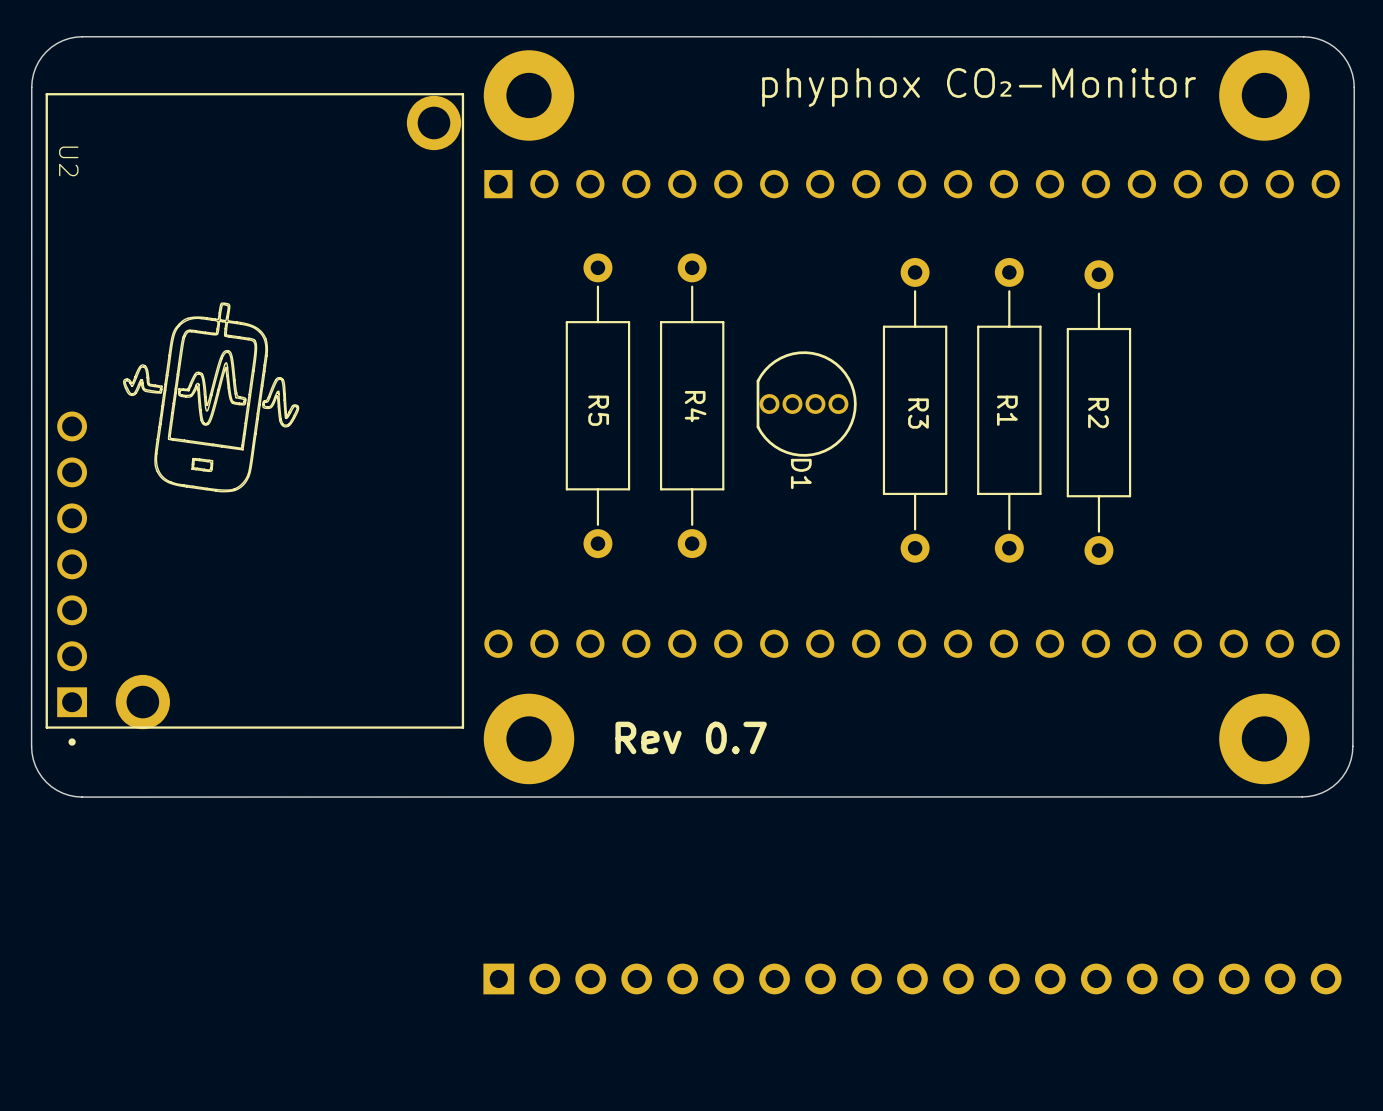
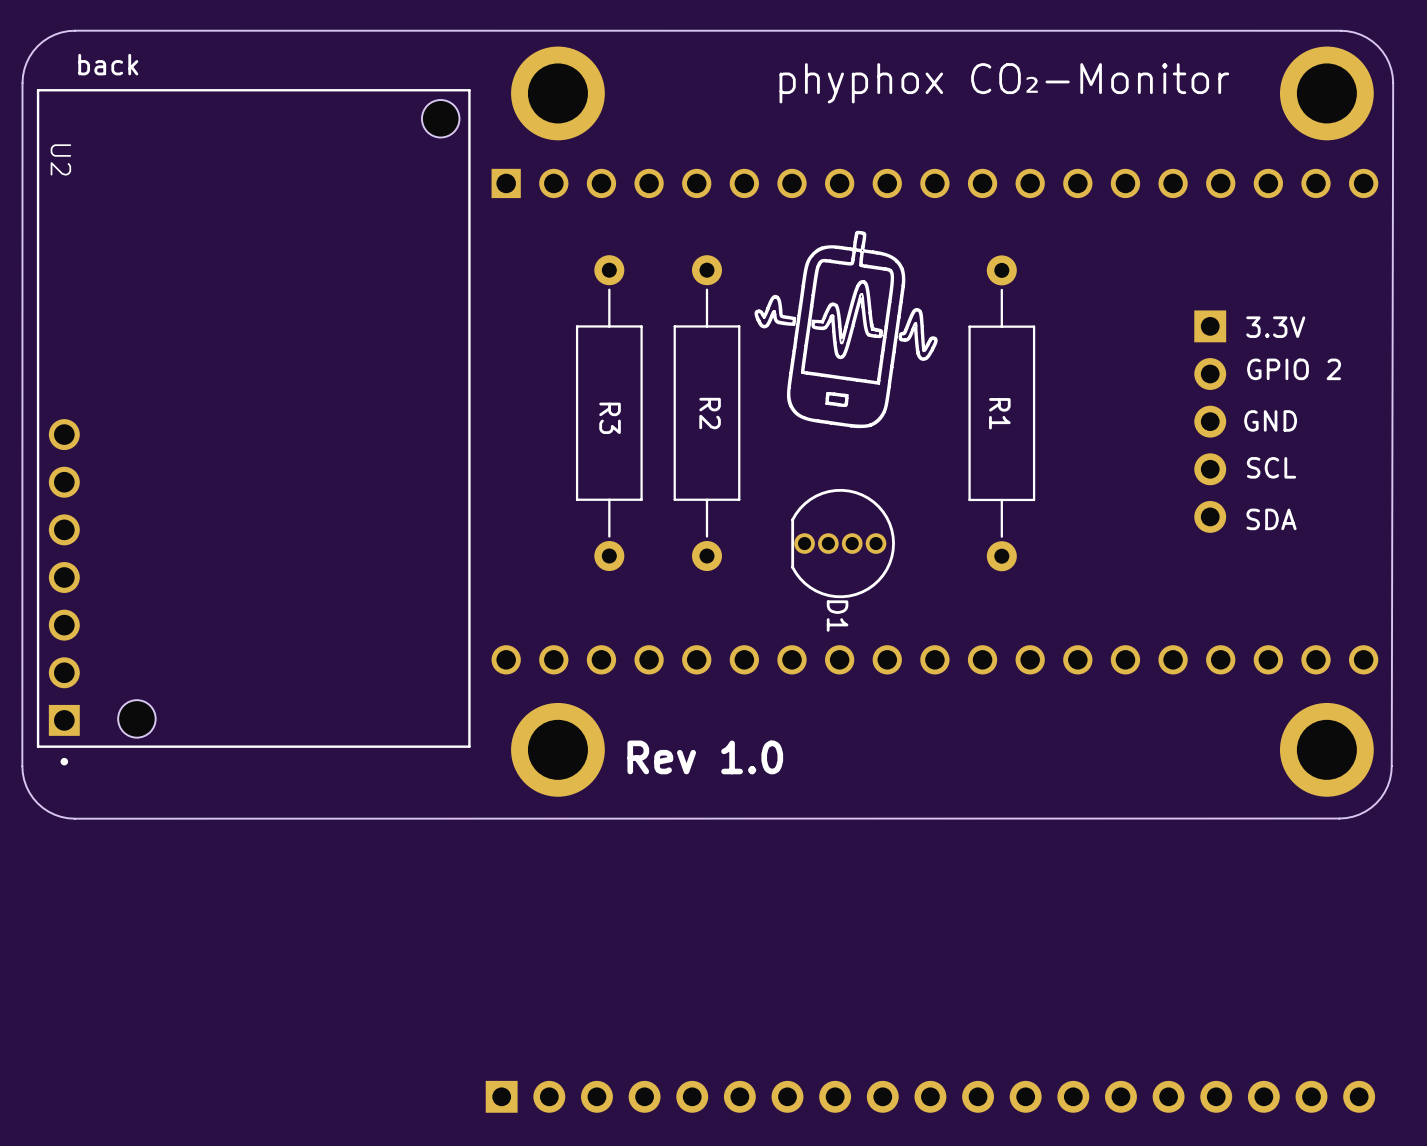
text: none -> back (108, 64)
part footprint: [406, 95, 462, 151] -> [421, 100, 460, 138]
part: (529, 95) -> none
part: (1264, 95) -> none
part: none -> (557, 93)
part: none -> (1326, 93)
line: none -> (860, 231) (865, 234) (863, 249) (884, 253) (895, 259) (902, 268) (904, 280) (886, 408) (876, 422) (869, 426) (858, 427) (802, 417) (792, 409) (787, 395) (803, 278) (807, 260) (815, 251) (822, 247) (834, 246) (853, 248) (856, 233) (860, 231)
line: none -> (863, 234) (857, 234) (855, 249) (861, 249) (863, 234)
line: none -> (835, 247) (852, 250) (851, 263) (824, 259) (818, 264) (802, 372) (879, 383) (892, 274) (888, 268) (861, 264) (863, 251) (890, 257) (898, 263) (902, 273) (902, 285) (885, 406) (878, 418) (867, 425) (849, 424) (807, 418) (795, 411) (790, 400) (789, 387) (807, 265) (811, 257) (817, 251) (826, 248) (835, 247)
line: none -> (854, 250) (852, 264) (823, 261) (819, 266) (803, 370) (877, 382) (891, 274) (887, 270) (860, 265) (861, 251) (854, 250)
line: none -> (863, 281) (859, 282) (856, 288) (841, 337) (839, 312) (835, 304) (829, 304) (822, 321) (812, 320) (813, 327) (823, 329) (831, 318) (835, 350) (839, 357) (843, 356) (846, 351) (861, 298) (866, 333) (871, 336) (881, 336) (881, 330) (873, 326) (868, 288) (863, 281)
line: none -> (863, 282) (860, 284) (856, 290) (842, 343) (834, 305) (830, 306) (822, 322) (814, 323) (815, 326) (824, 327) (833, 315) (836, 349) (840, 356) (845, 347) (861, 294) (867, 332) (871, 334) (880, 334) (880, 331) (871, 329) (866, 289) (863, 282)
line: none -> (777, 296) (772, 297) (764, 315) (760, 310) (755, 311) (756, 318) (761, 326) (767, 325) (773, 313) (777, 322) (794, 324) (795, 317) (781, 315) (780, 302) (777, 296)
line: none -> (775, 297) (772, 299) (764, 317) (760, 312) (757, 312) (763, 325) (766, 324) (774, 310) (777, 320) (793, 322) (793, 319) (780, 316) (778, 301) (775, 297)
line: (224, 303) (229, 305) (228, 320) (247, 324) (259, 329) (265, 338) (267, 349) (249, 473) (240, 487) (233, 490) (223, 491) (168, 482) (159, 474) (155, 460) (174, 330) (181, 321) (188, 318) (218, 319) (220, 304) (224, 303) -> none
line: (227, 305) (222, 305) (220, 319) (226, 319) (227, 305) -> none
line: none -> (916, 309) (921, 314) (924, 349) (930, 338) (934, 337) (936, 339) (930, 354) (924, 359) (920, 358) (917, 354) (914, 327) (908, 339) (902, 340) (899, 338) (900, 333) (904, 331) (912, 312) (916, 309)
line: none -> (917, 310) (913, 313) (905, 333) (901, 334) (901, 337) (903, 339) (907, 338) (916, 323) (918, 352) (920, 357) (924, 358) (928, 354) (935, 340) (932, 338) (923, 350) (920, 315) (917, 310)
line: (201, 318) (217, 321) (216, 333) (189, 330) (184, 334) (168, 439) (242, 449) (256, 344) (252, 339) (226, 334) (227, 322) (254, 327) (261, 334) (265, 343) (265, 354) (248, 472) (242, 483) (232, 489) (214, 489) (174, 483) (162, 476) (157, 465) (156, 453) (174, 335) (177, 328) (183, 322) (192, 318) (201, 318) -> none
line: (219, 321) (217, 334) (189, 331) (185, 336) (170, 437) (241, 448) (254, 344) (250, 340) (225, 335) (225, 322) (219, 321) -> none
text: none -> 3.3V (1275, 327)
line: (228, 350) (224, 351) (220, 357) (207, 405) (204, 380) (201, 373) (195, 373) (187, 389) (178, 388) (179, 395) (189, 397) (197, 386) (200, 417) (204, 424) (208, 423) (211, 418) (225, 367) (231, 401) (236, 404) (245, 403) (245, 398) (237, 394) (232, 358) (228, 350) -> none
line: (228, 352) (224, 353) (221, 359) (207, 410) (200, 374) (196, 375) (188, 390) (180, 391) (181, 394) (190, 395) (198, 383) (201, 416) (205, 423) (211, 415) (225, 363) (232, 400) (236, 402) (243, 402) (244, 399) (236, 397) (230, 358) (228, 352) -> none
text: none -> GPIO 2 (1294, 369)
line: (145, 365) (139, 367) (132, 383) (128, 379) (124, 380) (125, 386) (129, 394) (135, 393) (141, 382) (144, 390) (161, 392) (162, 386) (149, 384) (145, 365) -> none
line: (143, 366) (140, 368) (132, 386) (128, 381) (125, 381) (131, 393) (134, 392) (142, 379) (144, 389) (160, 390) (160, 387) (148, 384) (146, 370) (143, 366) -> none
line: (279, 377) (284, 382) (286, 417) (292, 405) (296, 405) (298, 407) (292, 421) (286, 426) (282, 425) (280, 421) (277, 395) (271, 407) (265, 408) (262, 406) (263, 401) (267, 399) (275, 381) (279, 377) -> none
line: (279, 379) (276, 382) (268, 400) (264, 402) (264, 404) (266, 406) (270, 406) (278, 391) (281, 419) (282, 424) (286, 425) (290, 421) (297, 408) (294, 406) (285, 418) (282, 384) (279, 379) -> none
line: none -> (827, 393) (826, 403) (846, 405) (847, 395) (827, 393)
line: none -> (828, 394) (845, 396) (845, 403) (827, 402) (828, 394)
D1 position: (806, 404) -> (843, 543)
R4 name: R4 (695, 406) -> R2 (710, 413)
R5 name: R5 (598, 410) -> R3 (610, 418)
R3: (915, 410) -> none
R1 position: (1009, 410) -> (1001, 413)
R2: (1098, 412) -> none
part: none -> (1210, 421)
text: none -> GND (1270, 420)
line: (193, 458) (192, 469) (211, 470) (212, 460) (193, 458) -> none
text: none -> SCL (1271, 467)
line: (194, 460) (210, 462) (210, 469) (193, 467) (194, 460) -> none
text: none -> SDA (1271, 519)
part footprint: [115, 674, 170, 730] -> [118, 700, 156, 738]
part: none -> (557, 749)
part: none -> (1326, 749)
text: Rev 0.7 (691, 737) -> Rev 1.0 (705, 757)
part: (529, 738) -> none
part: (1264, 738) -> none
part position: (912, 978) -> (930, 1096)

